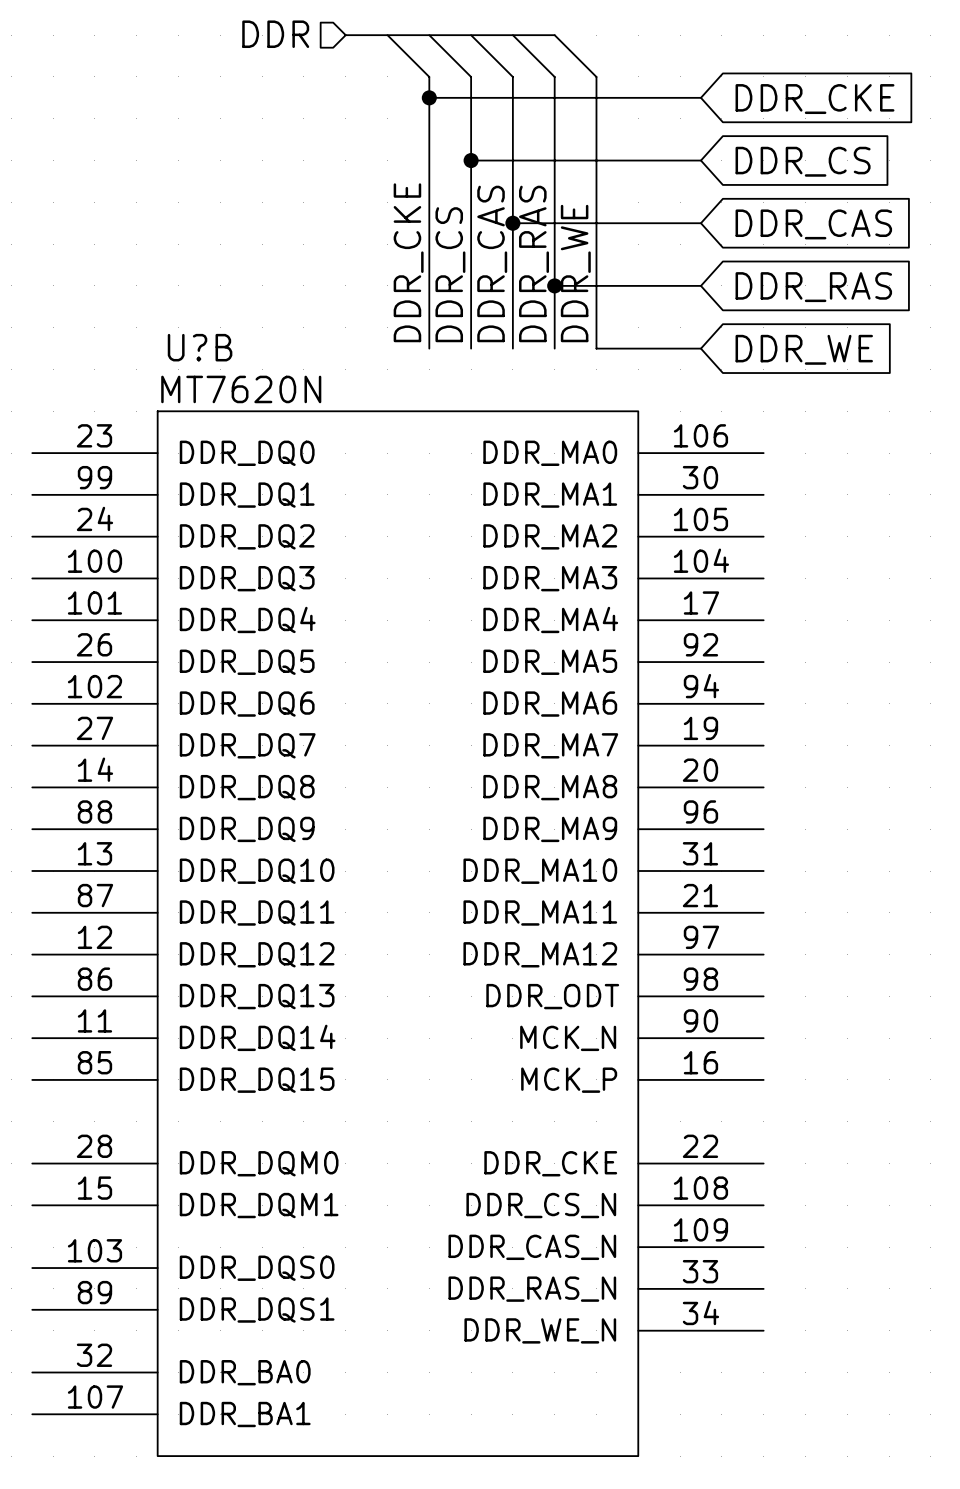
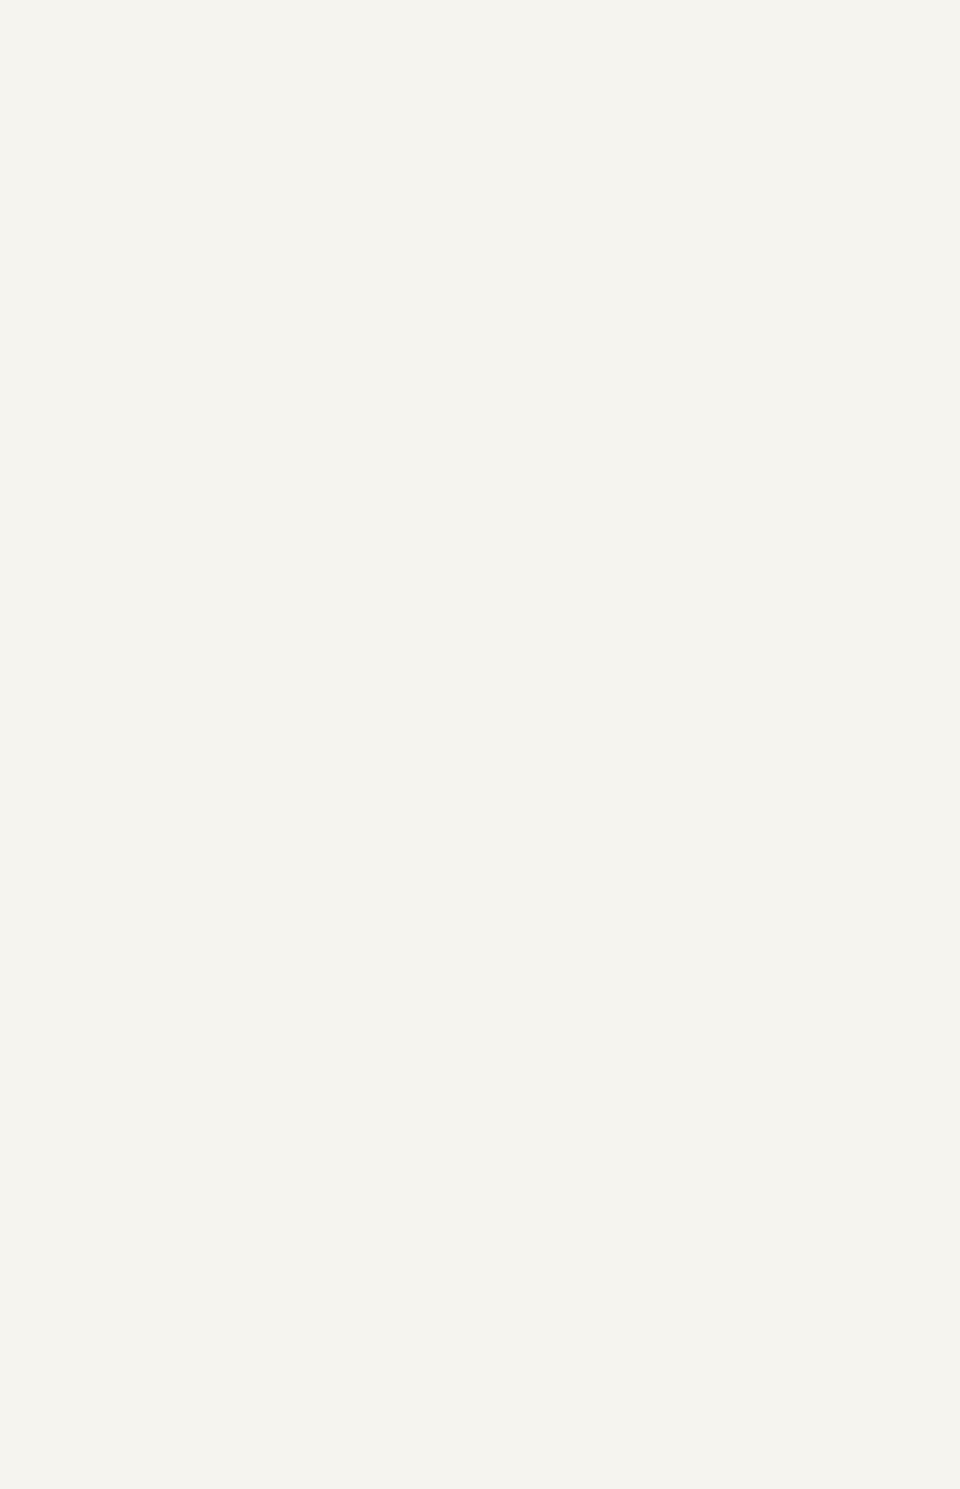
hierarchical label: DDR (275, 34) -> none
bus: (345, 35) (554, 35) -> none
wire: (387, 35) (429, 76) (429, 348) -> none
wire: (429, 35) (471, 76) (471, 348) -> none
wire: (471, 35) (512, 76) (512, 348) -> none
wire: (512, 35) (554, 76) (554, 348) -> none
wire: (554, 35) (596, 76) (596, 348) (700, 348) -> none
wire: (429, 97) (700, 97) -> none
junction: (429, 97) -> none
global label: DDR_CKE (815, 99) -> none
wire: (471, 160) (700, 160) -> none
junction: (471, 160) -> none
global label: DDR_CS (803, 161) -> none
wire: (512, 223) (700, 223) -> none
junction: (512, 223) -> none
global label: DDR_CAS (813, 224) -> none
label: DDR_CKE (408, 262) -> none
label: DDR_CAS (492, 263) -> none
label: DDR_RAS (534, 263) -> none
label: DDR_WE (575, 273) -> none
label: DDR_CS (450, 274) -> none
wire: (554, 285) (700, 285) -> none
junction: (554, 285) -> none
global label: DDR_RAS (813, 287) -> none
global label: DDR_WE (804, 349) -> none
U?B: MT7620N (397, 933) -> none

